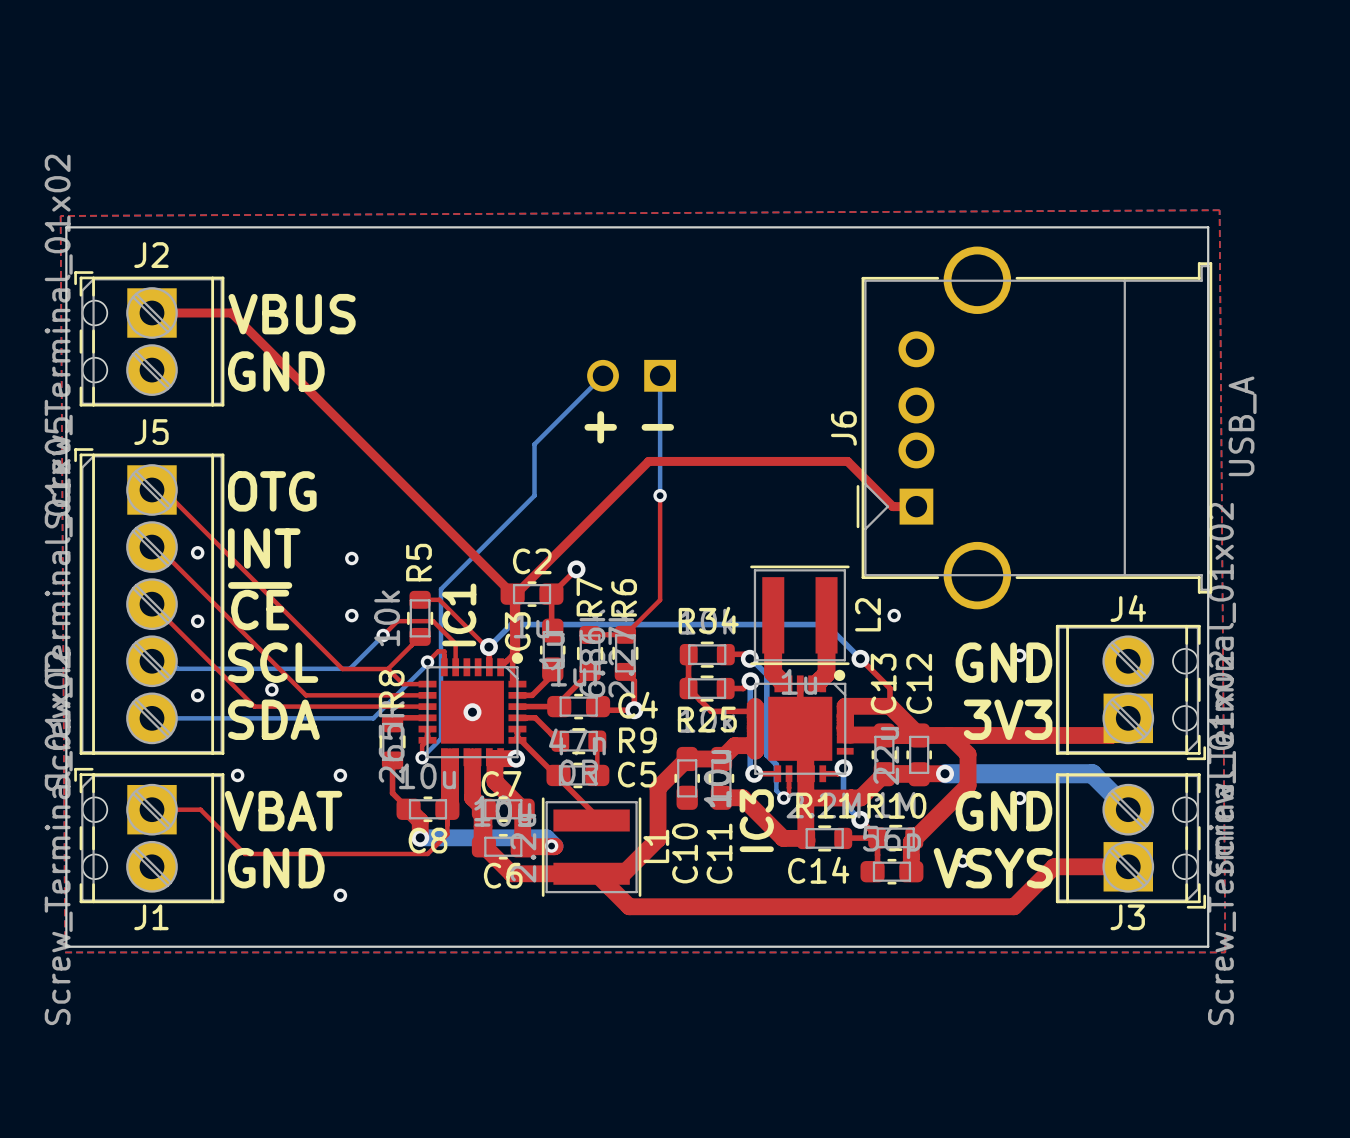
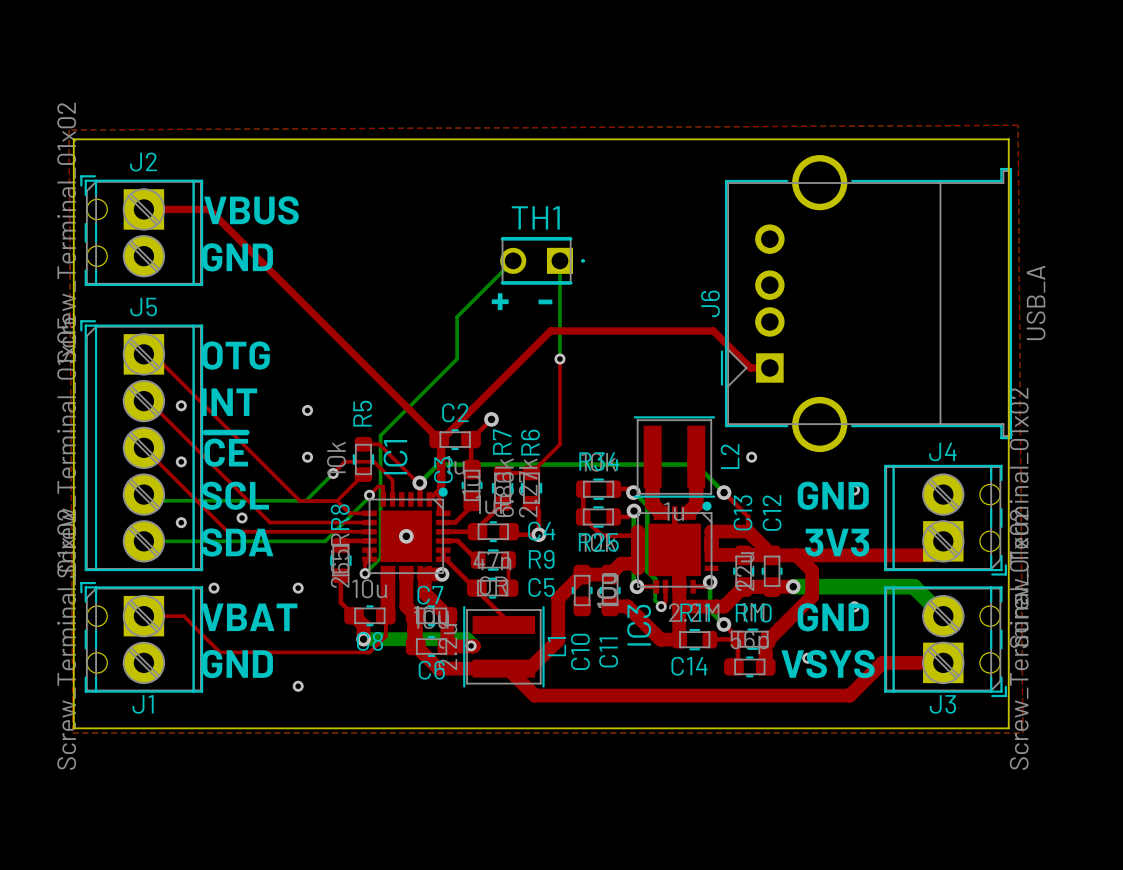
TH1 side: bottom (631, 375) -> top (542, 260)

